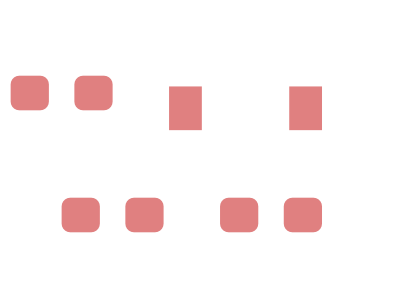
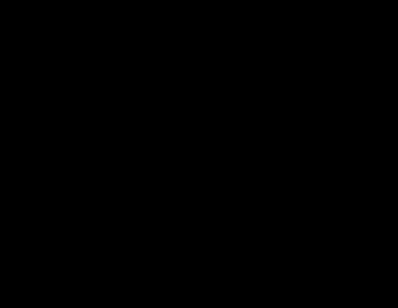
part: (61, 93) -> none
part: (245, 108) -> none
part: (112, 214) -> none
part: (271, 214) -> none

